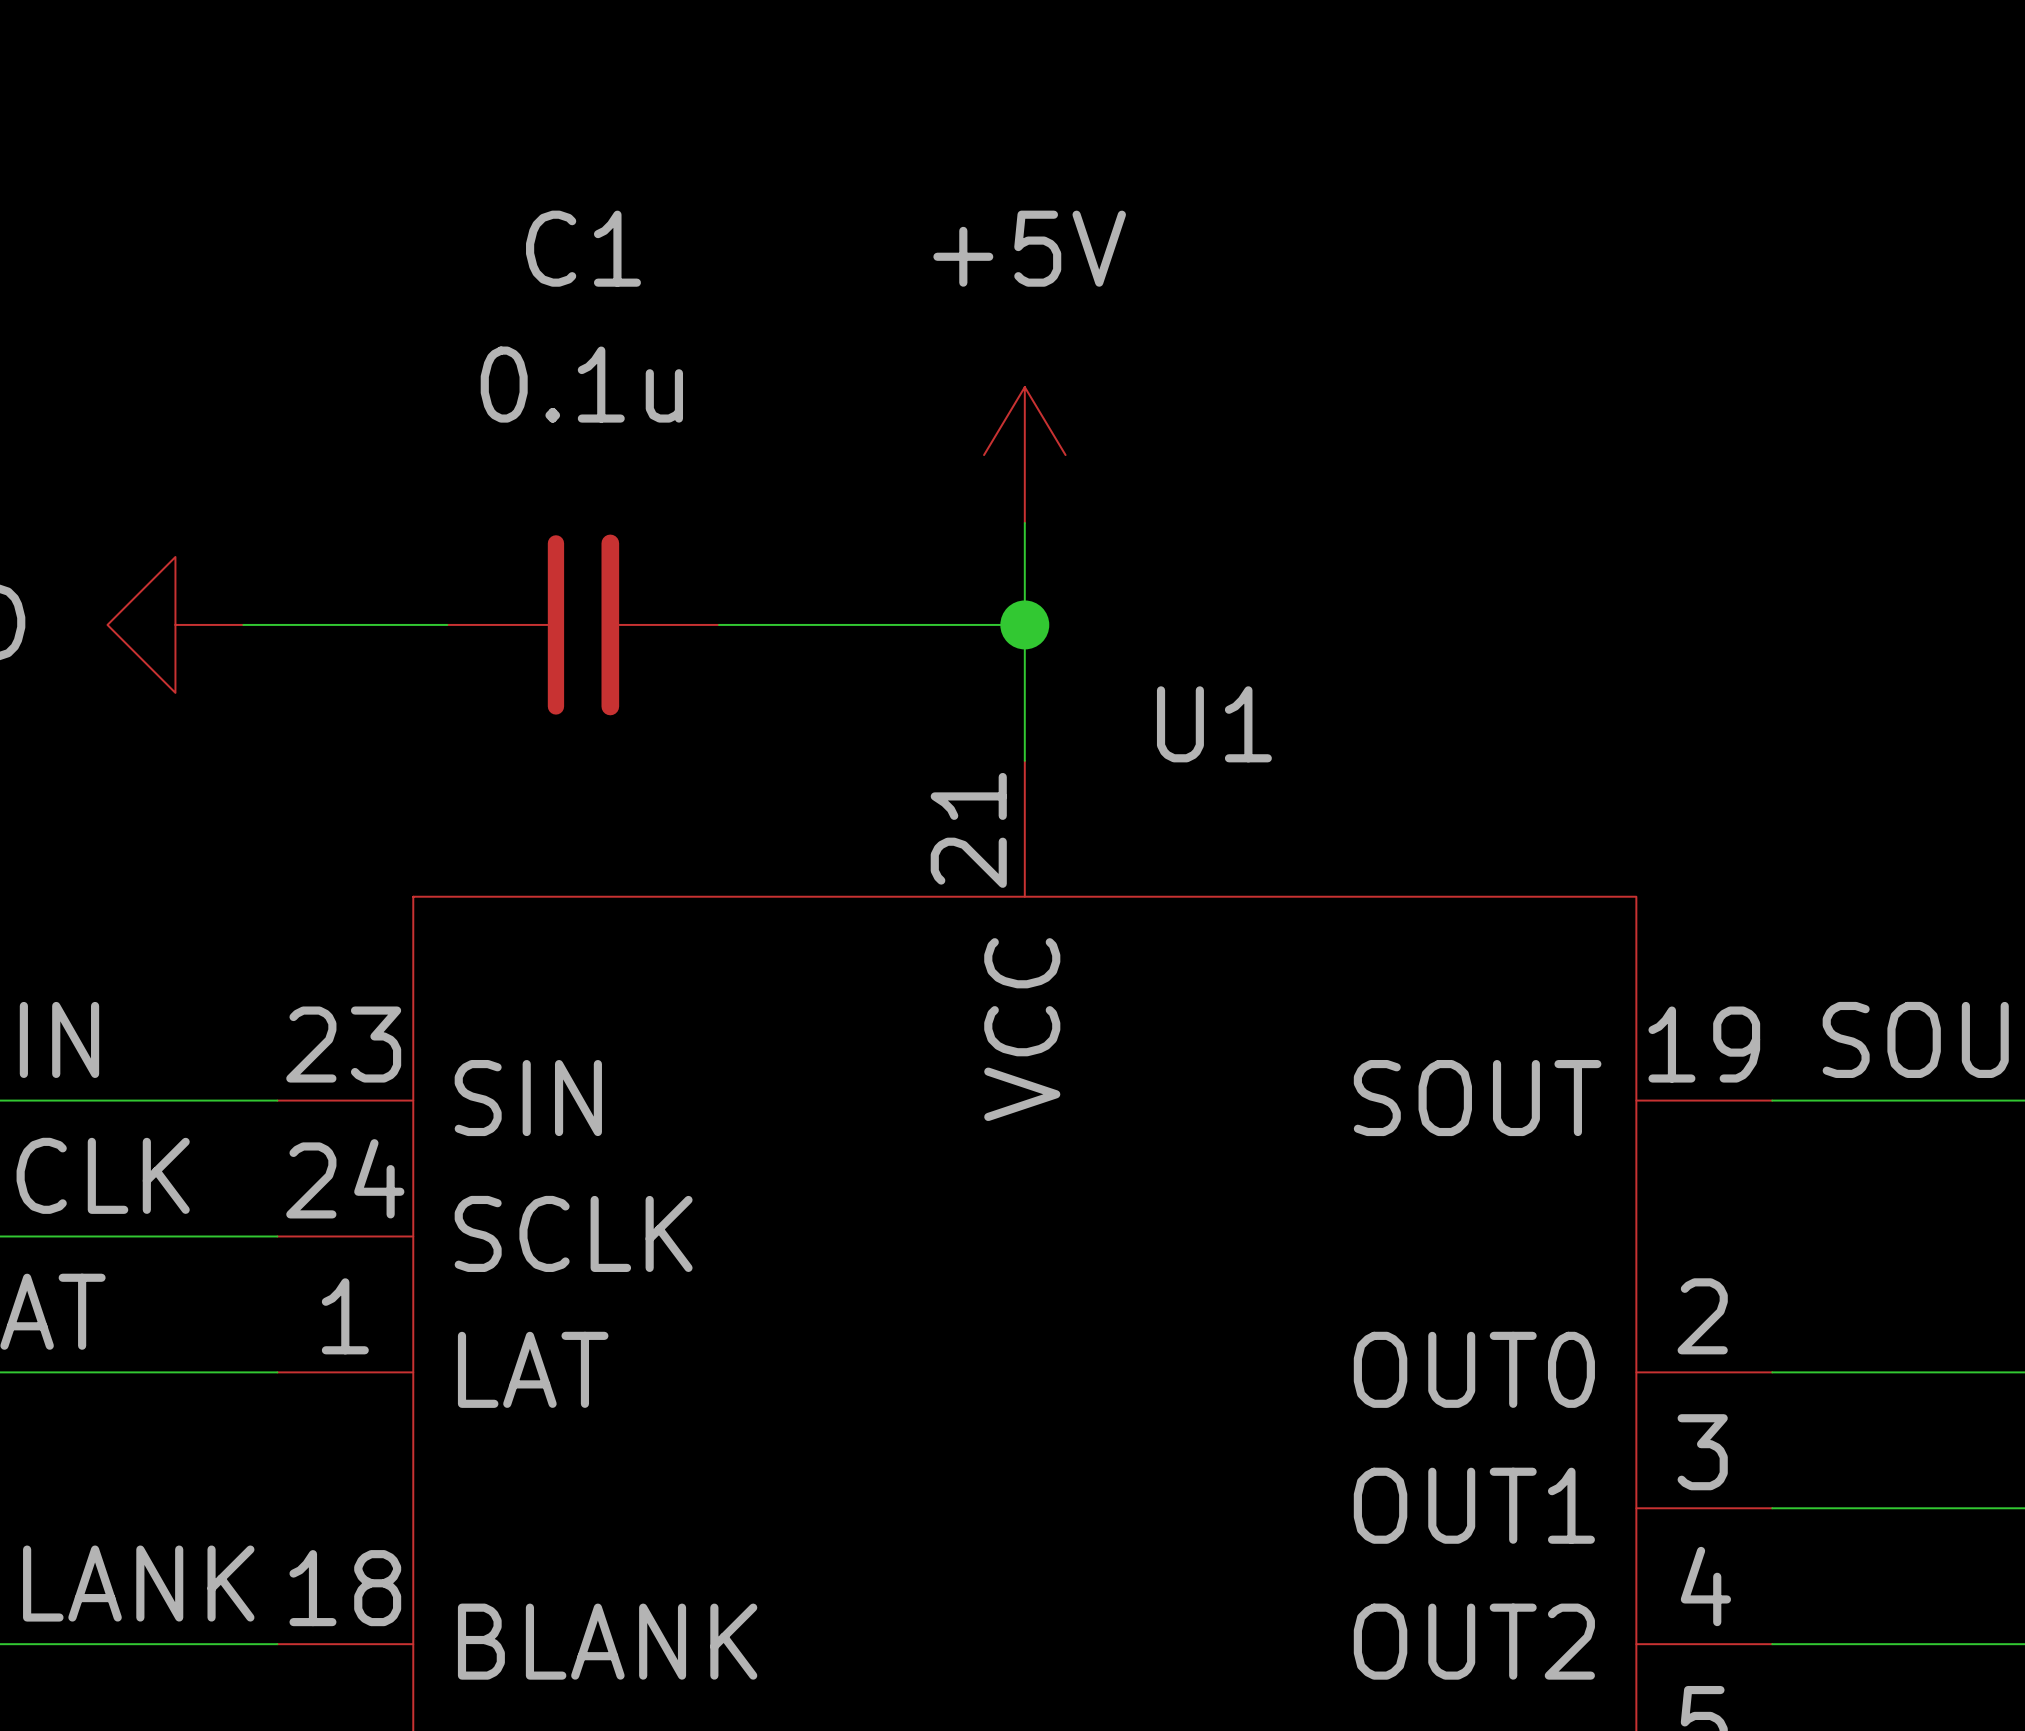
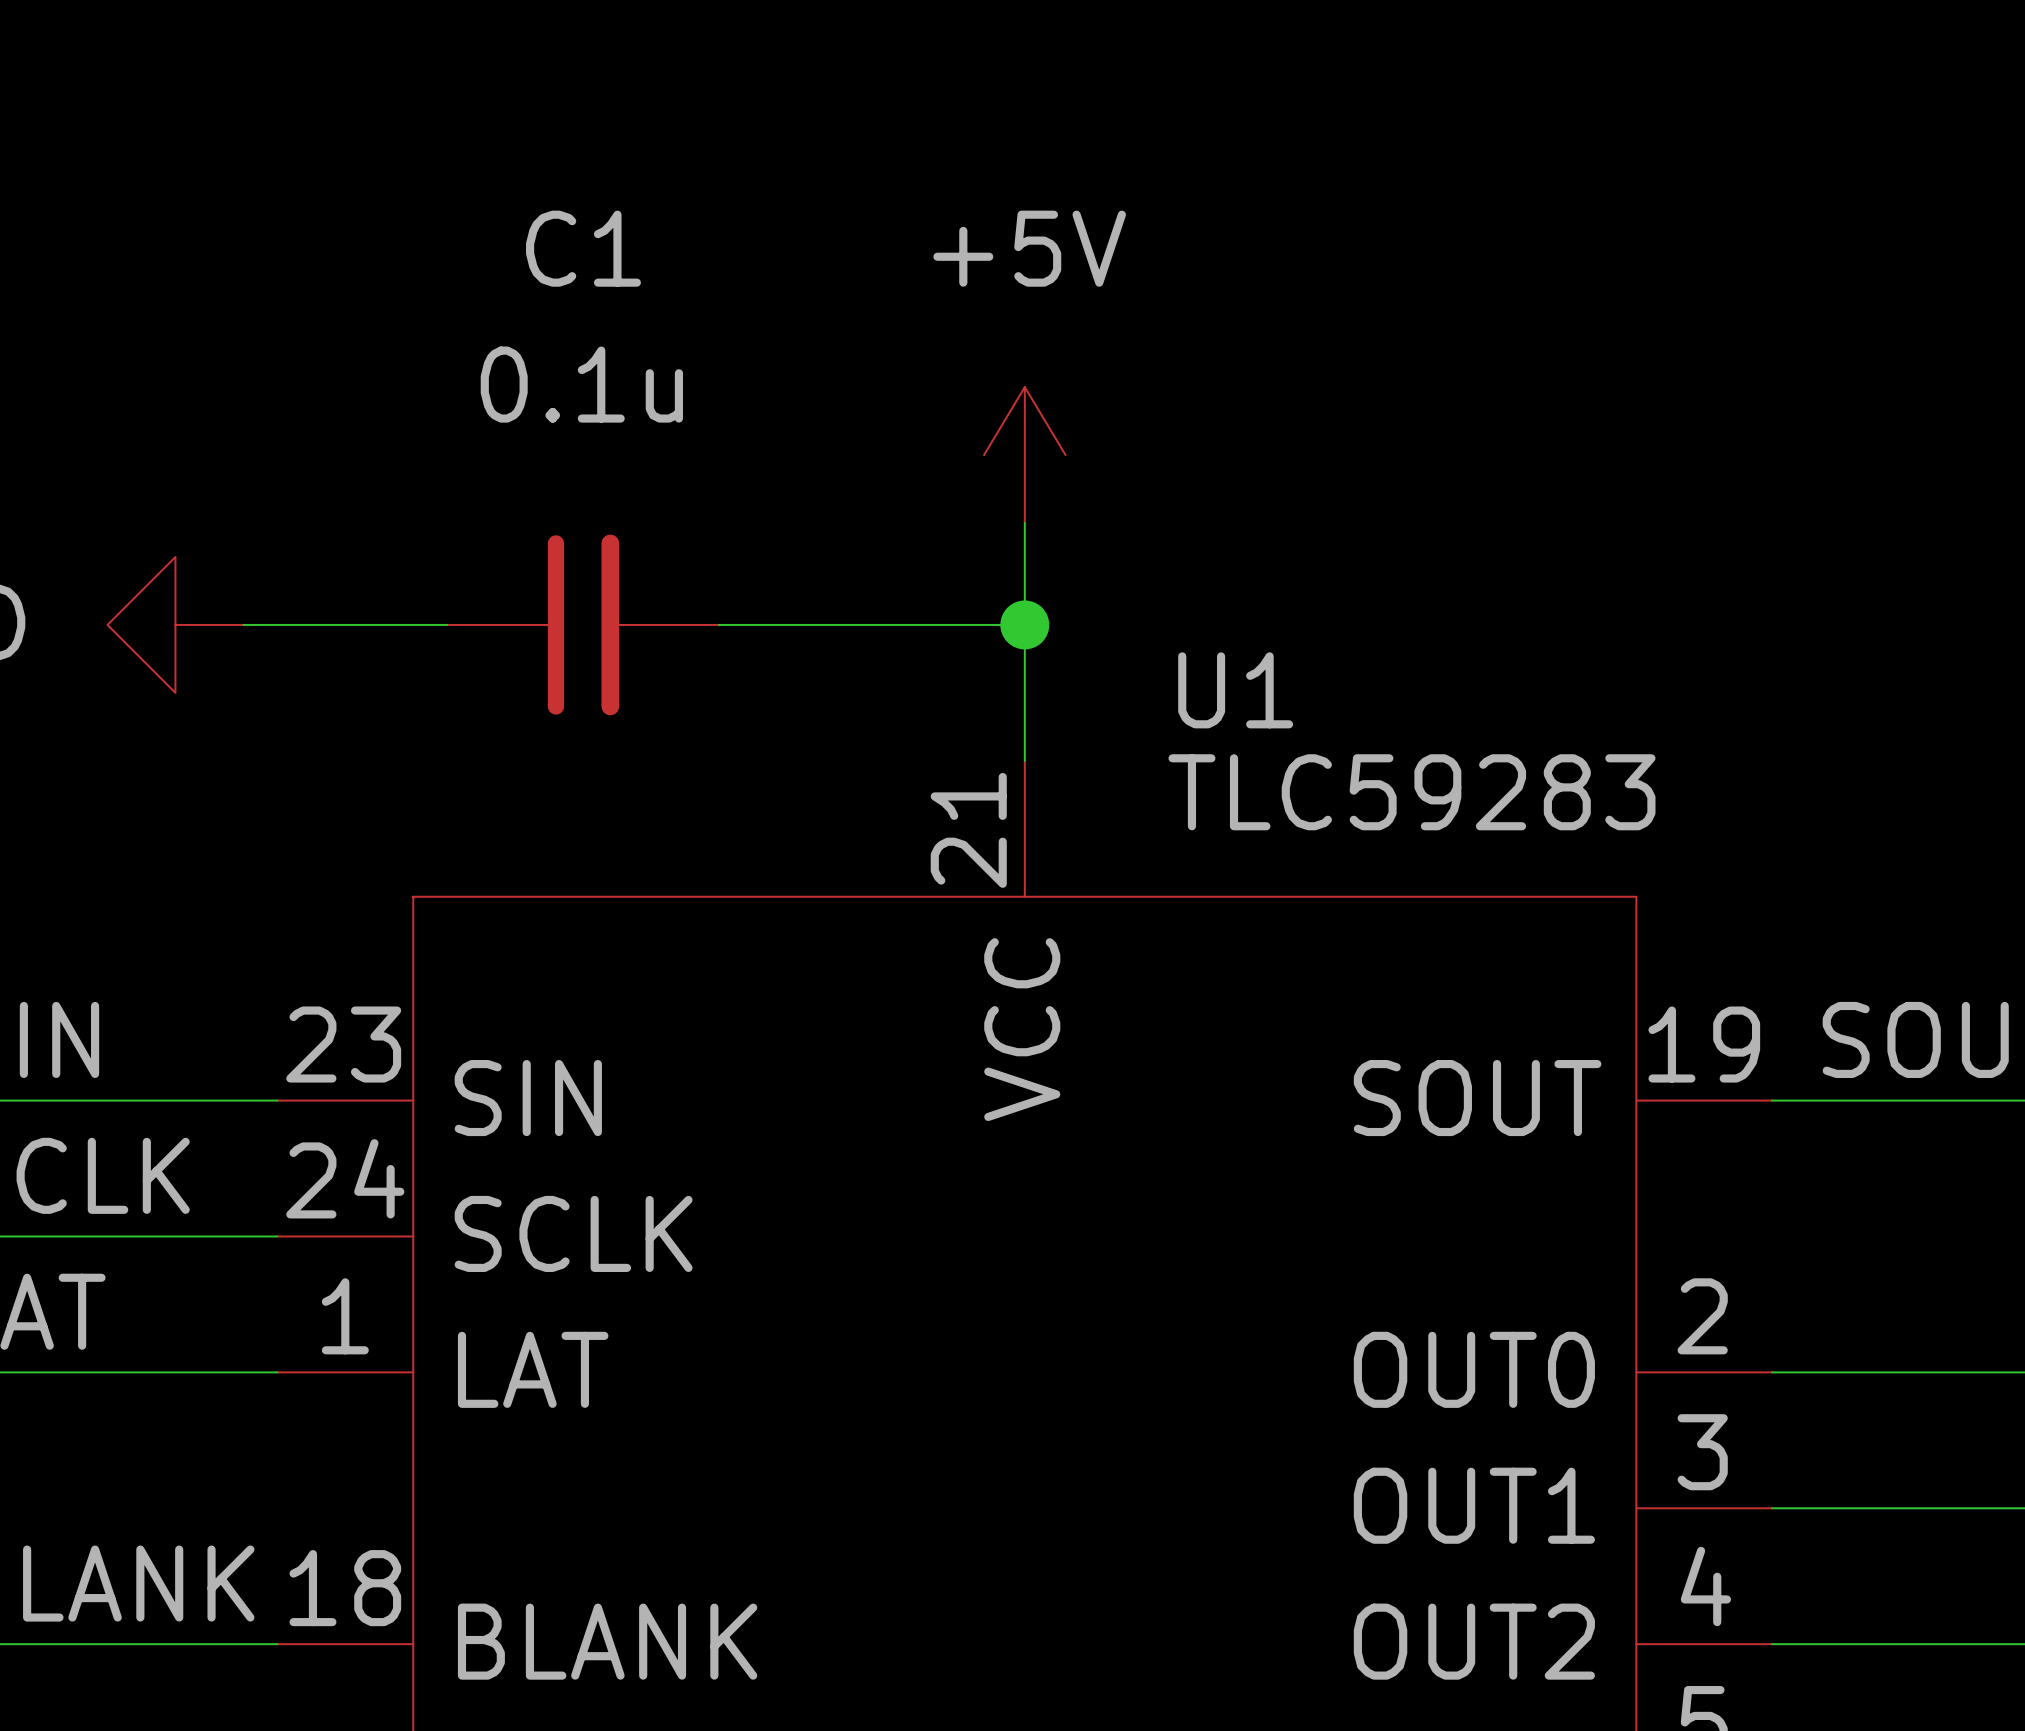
U1 name position: U1 (1214, 724) -> U1 (1235, 690)
U1 value: none -> TLC59283 (1411, 792)

